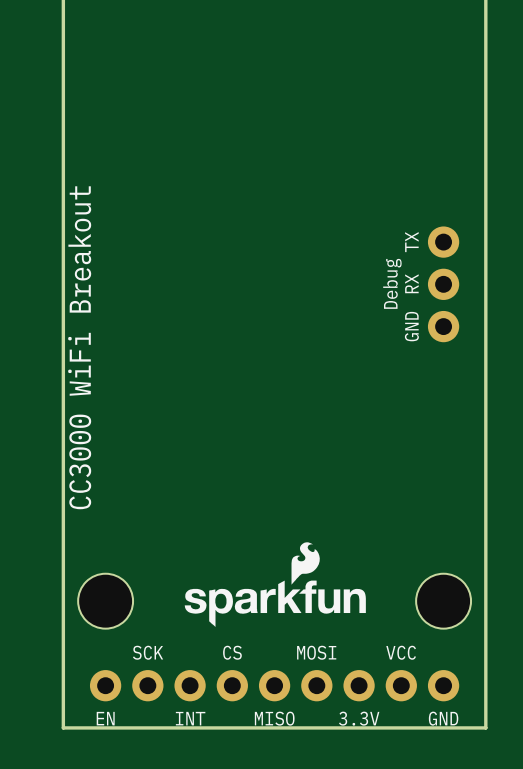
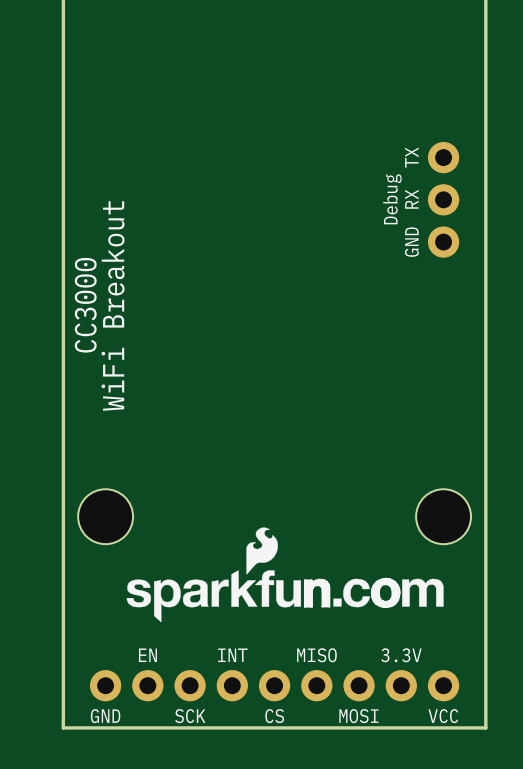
text: none -> TX (411, 157)
text: TX (411, 242) -> GND (411, 242)
text position: Debug (392, 283) -> Debug (392, 199)
text position: RX (411, 283) -> RX (411, 199)
part position: (443, 284) -> (443, 199)
text: none -> CC3000 (85, 305)
text: GND (411, 326) -> none
text: CC3000 WiFi Breakout (79, 347) -> WiFi Breakout (113, 305)
drawing shape: [184, 542, 366, 627] -> [126, 527, 444, 623]
part position: (105, 601) -> (105, 516)
part position: (443, 601) -> (443, 516)
text position: SCK (148, 652) -> SCK (190, 716)
text position: CS (232, 652) -> CS (274, 716)
text position: MOSI (316, 652) -> MOSI (358, 716)
text position: VCC (401, 652) -> VCC (443, 716)
text: none -> GND (105, 716)
text position: EN (105, 718) -> EN (147, 655)
text position: INT (190, 718) -> INT (232, 655)
text position: MISO (274, 718) -> MISO (316, 655)
text position: 3.3V (359, 718) -> 3.3V (401, 655)
text: GND (443, 718) -> none

